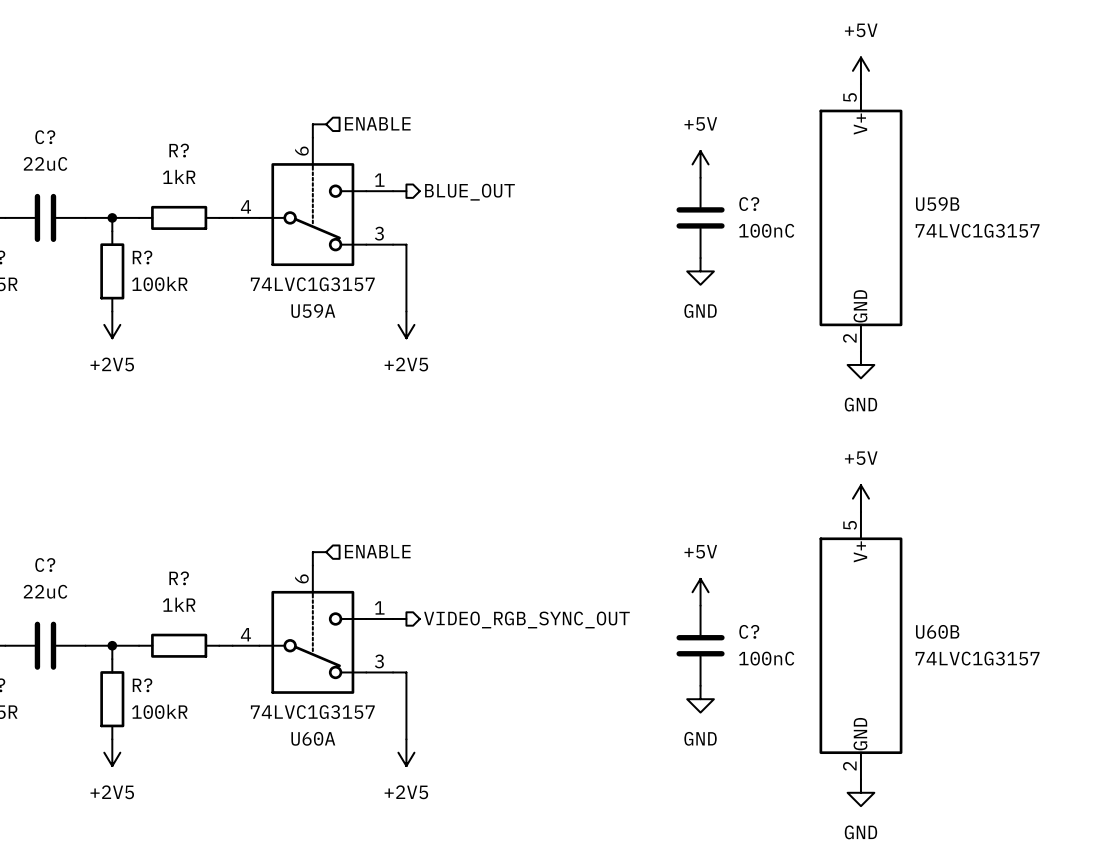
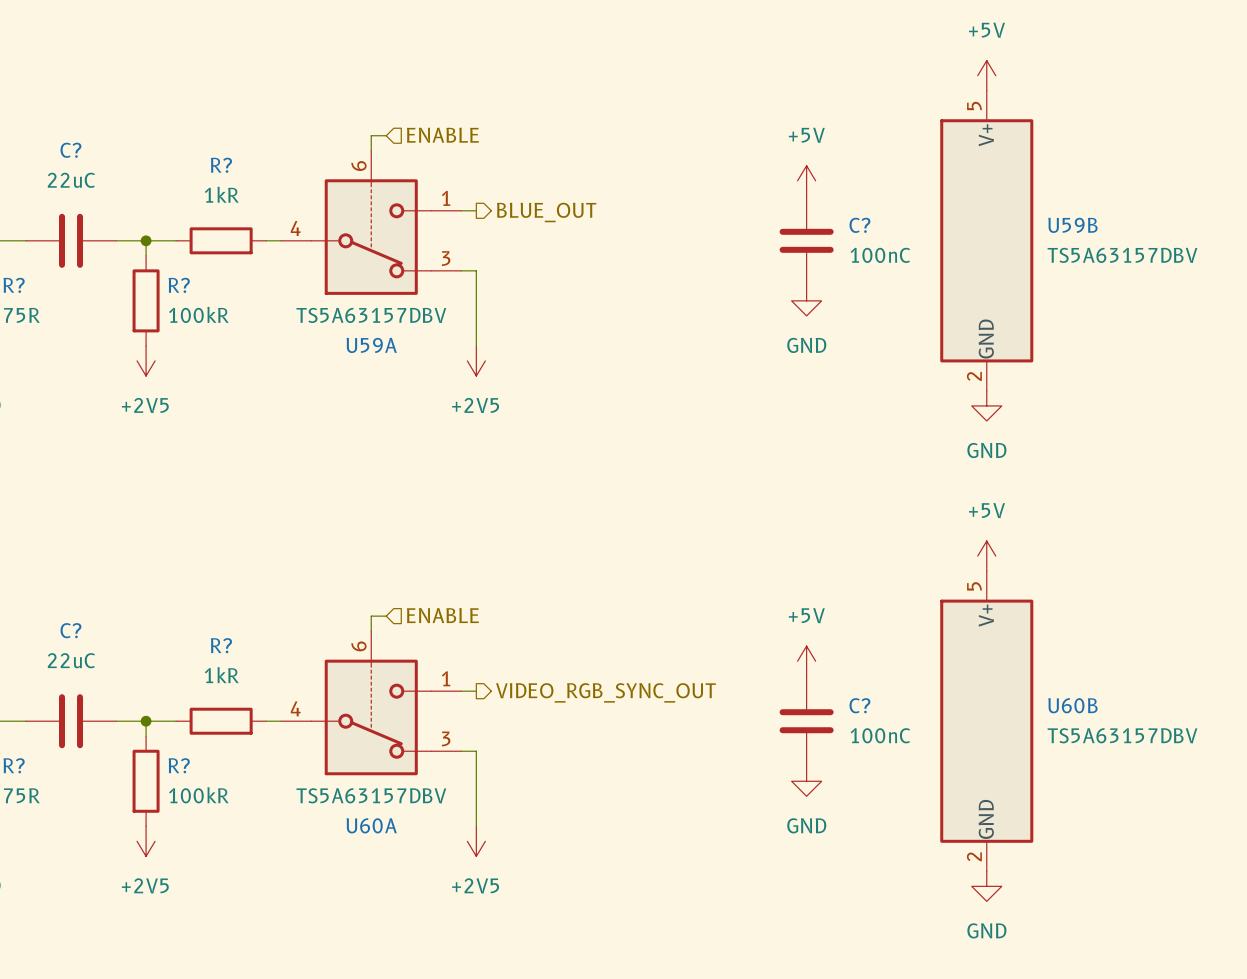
U59B value: 74LVC1G3157 (977, 230) -> TS5A63157DBV (1122, 255)
U59A value: 74LVC1G3157 (312, 284) -> TS5A63157DBV (371, 315)
U60B value: 74LVC1G3157 (977, 658) -> TS5A63157DBV (1122, 735)
U60A value: 74LVC1G3157 (312, 712) -> TS5A63157DBV (371, 795)

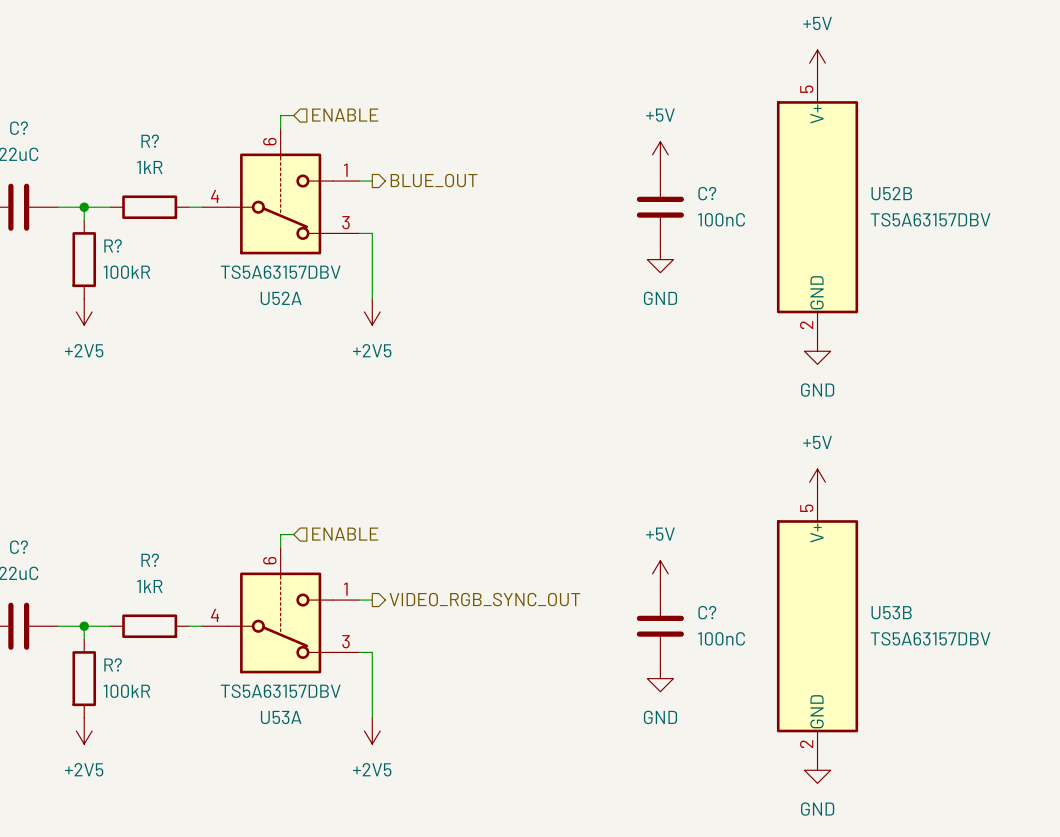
U59B name: U59B (1072, 225) -> U52B (891, 193)
U59A name: U59A (371, 345) -> U52A (281, 298)
U60B name: U60B (1072, 705) -> U53B (891, 612)
U60A name: U60A (371, 825) -> U53A (281, 717)

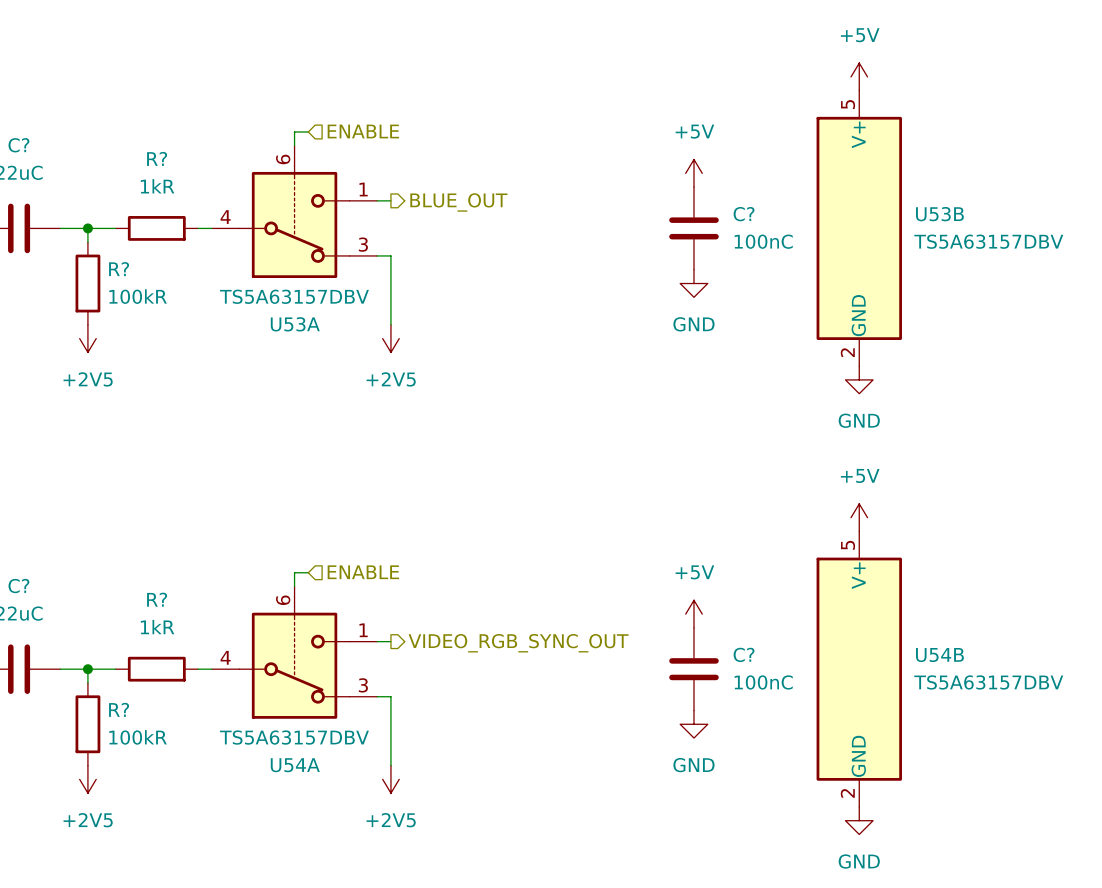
U52B name: U52B (891, 193) -> U53B (939, 214)
U52A name: U52A (281, 298) -> U53A (295, 324)
U53B name: U53B (891, 612) -> U54B (939, 655)
U53A name: U53A (281, 717) -> U54A (295, 765)

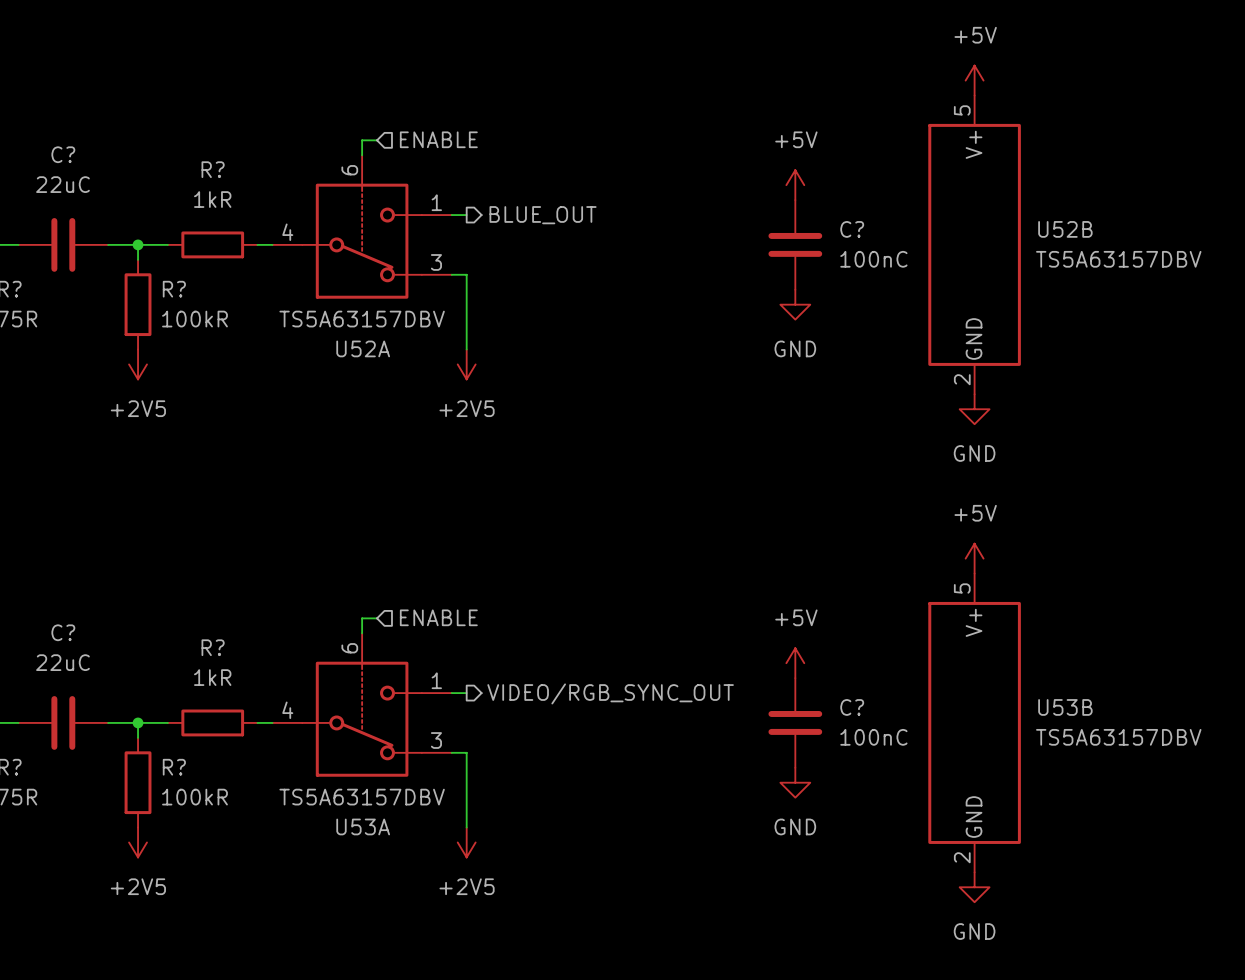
U53B name: U53B (939, 214) -> U52B (1065, 229)
U53A name: U53A (295, 324) -> U52A (363, 348)
hierarchical label: VIDEO_RGB_SYNC_OUT (518, 643) -> VIDEO/RGB_SYNC_OUT (610, 693)
U54B name: U54B (939, 655) -> U53B (1065, 707)
U54A name: U54A (295, 765) -> U53A (363, 826)

